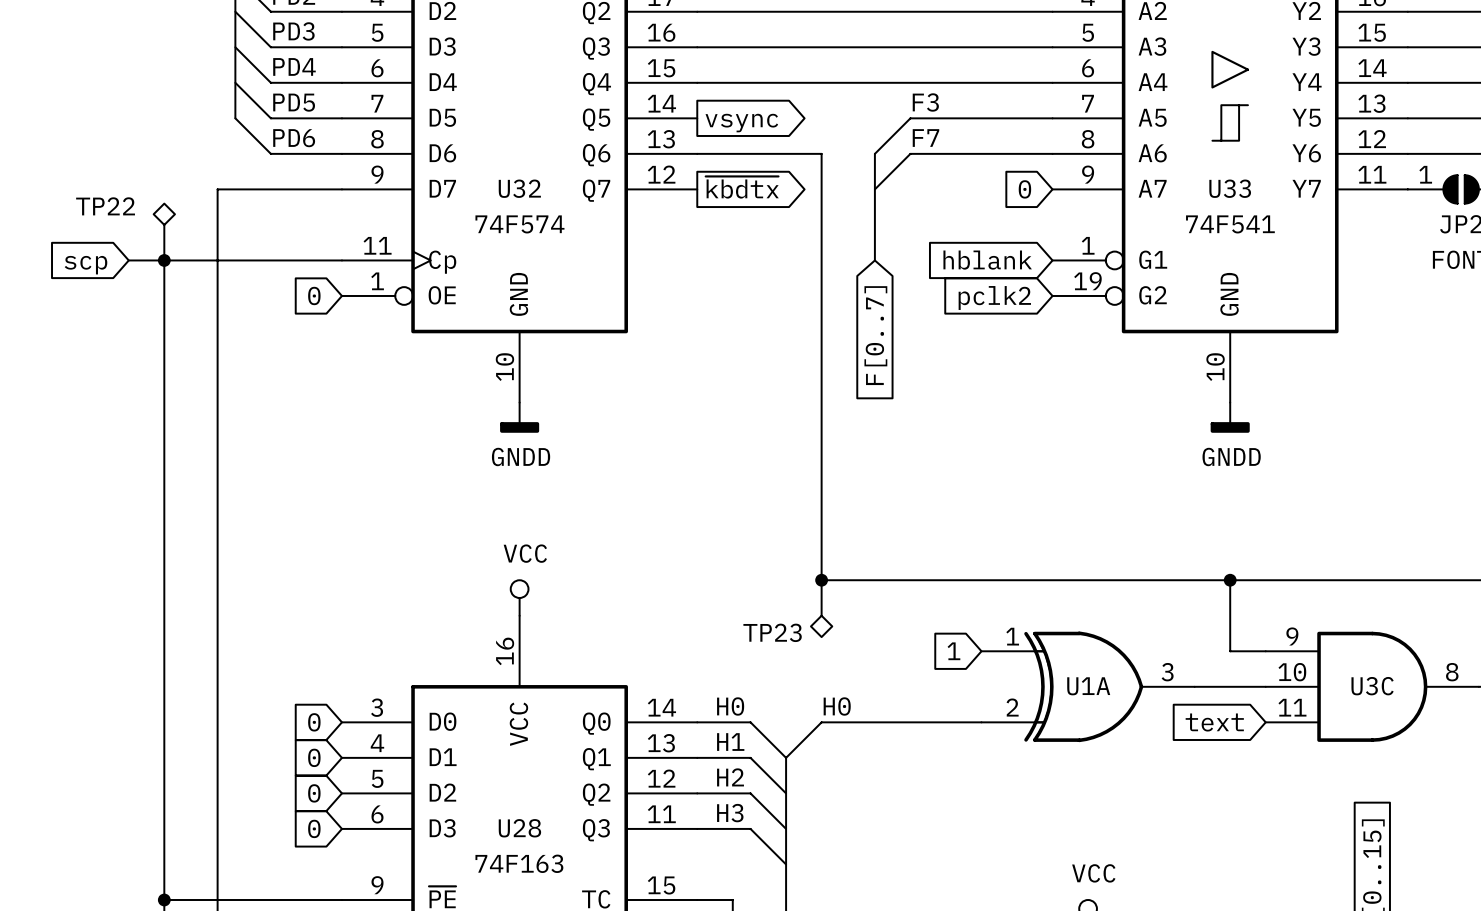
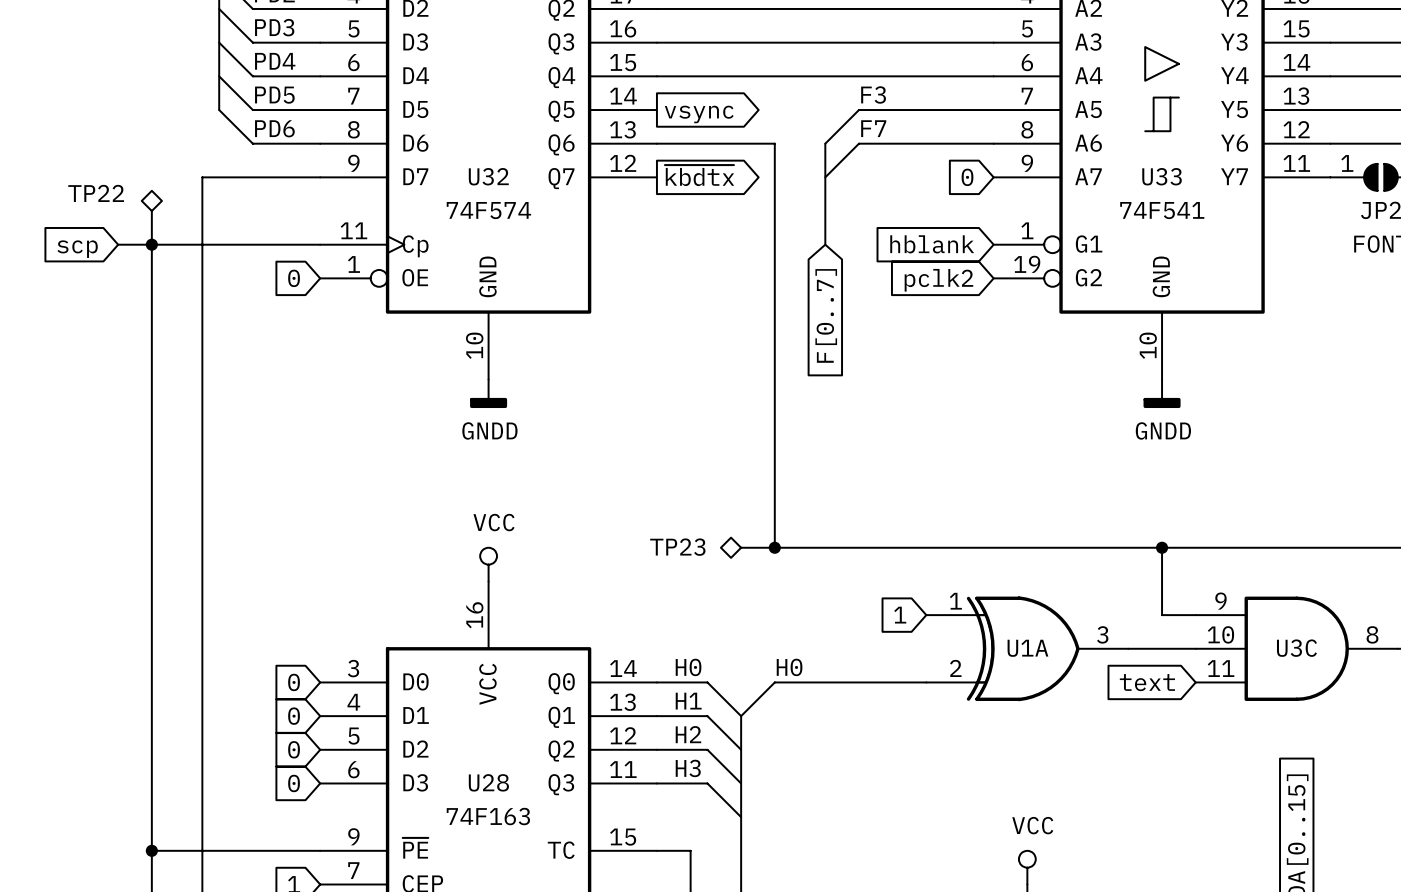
TP23 position: (821, 608) -> (747, 547)
TP23 rotation: 0° (821, 626) -> 90° clockwise (731, 547)
TP23 name position: TP23 (772, 632) -> TP23 (677, 547)

